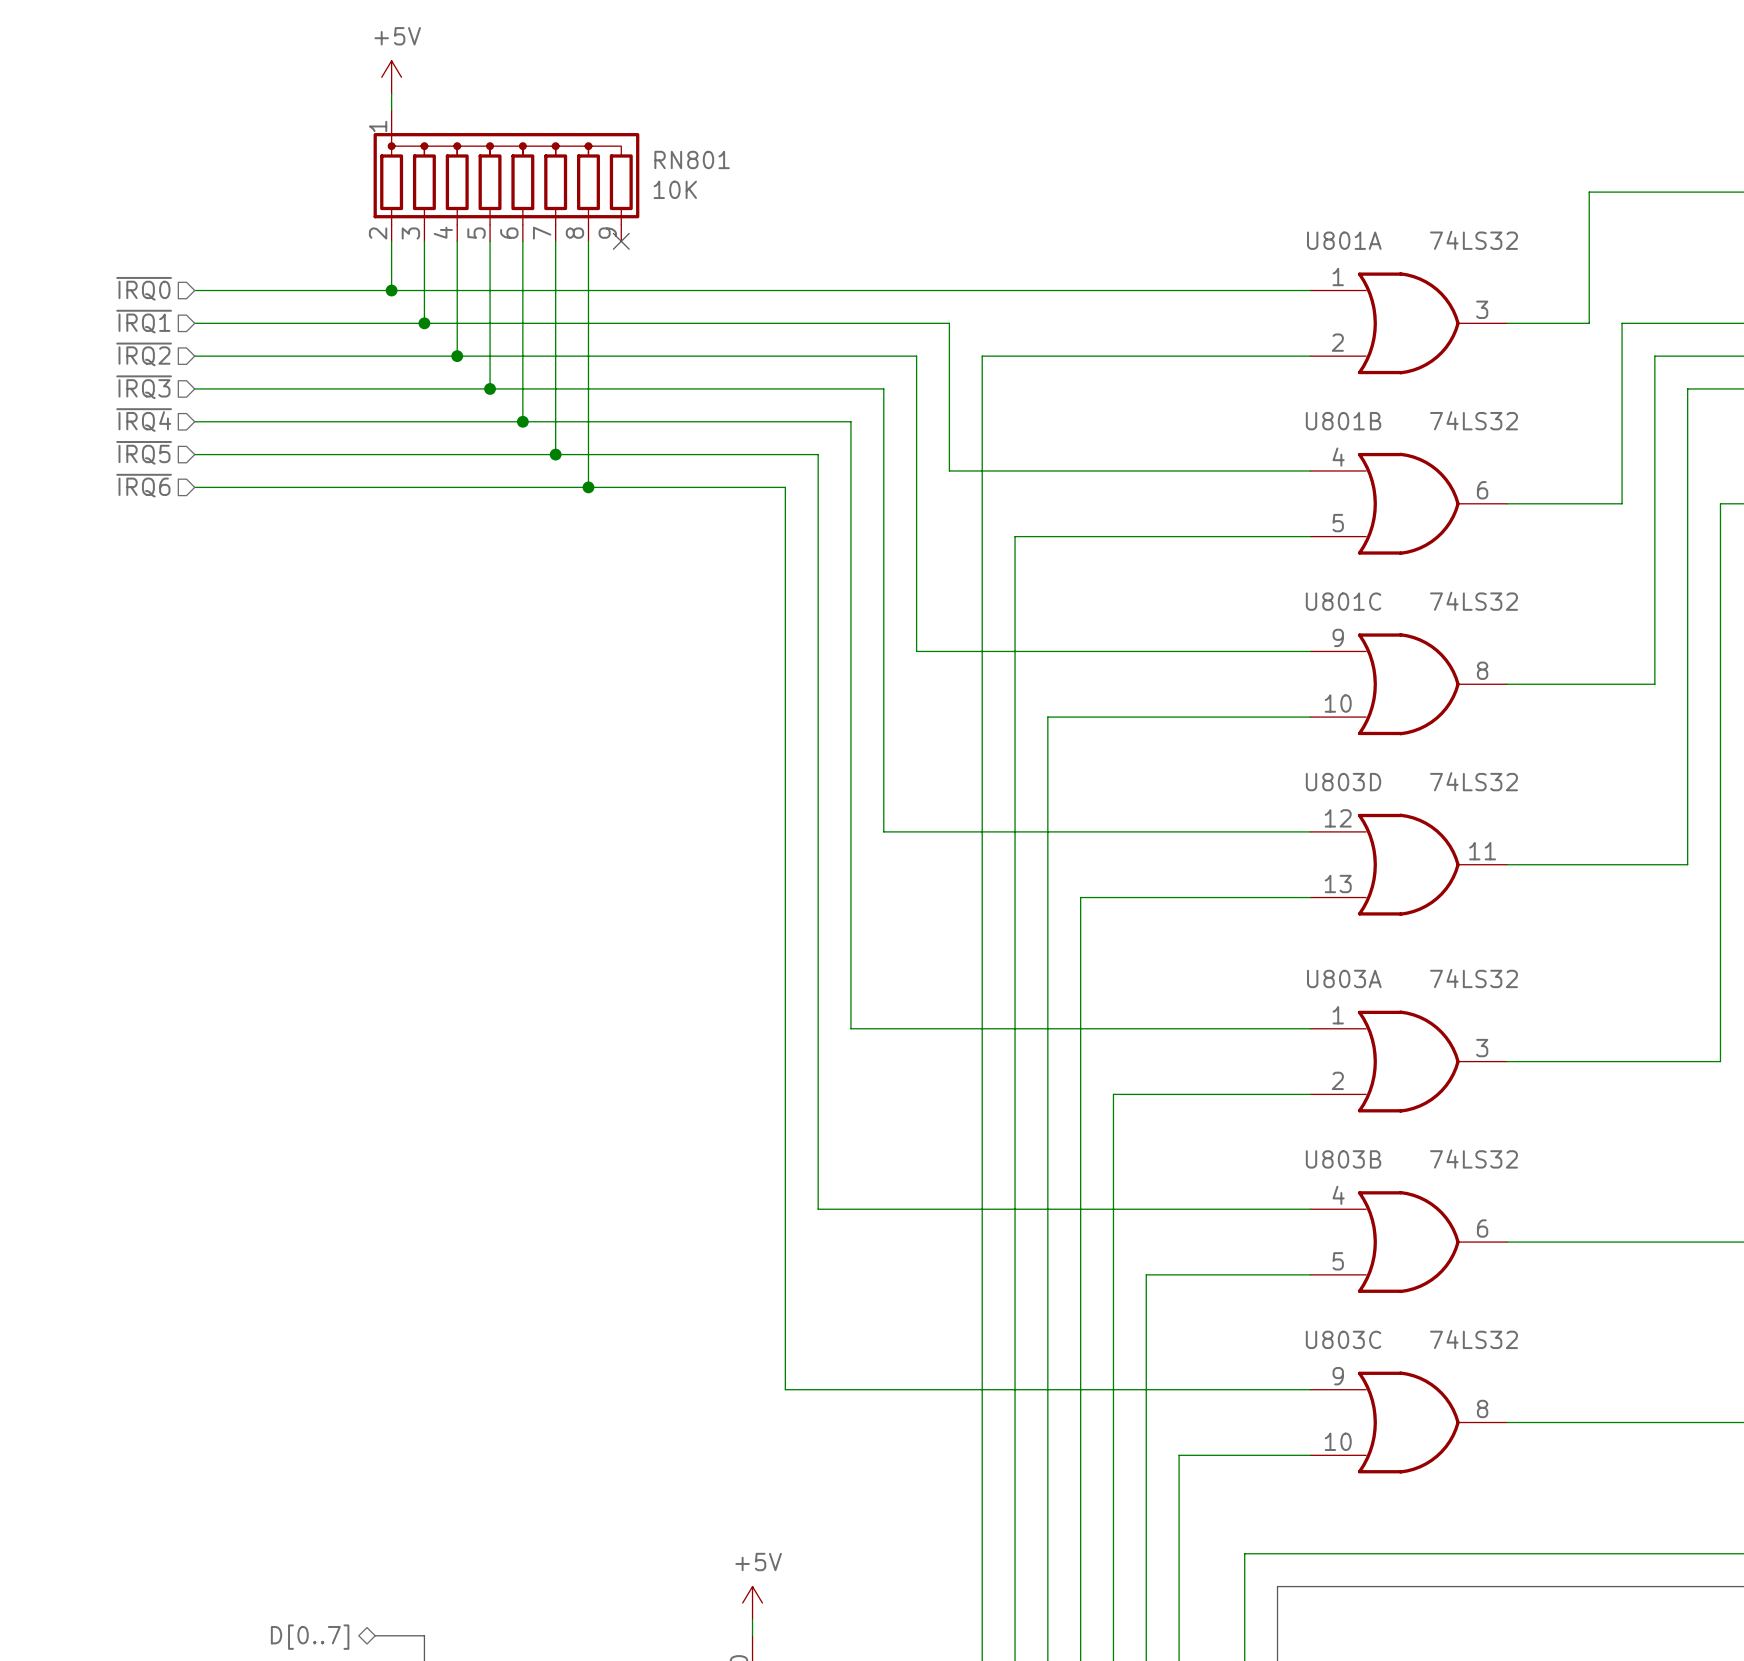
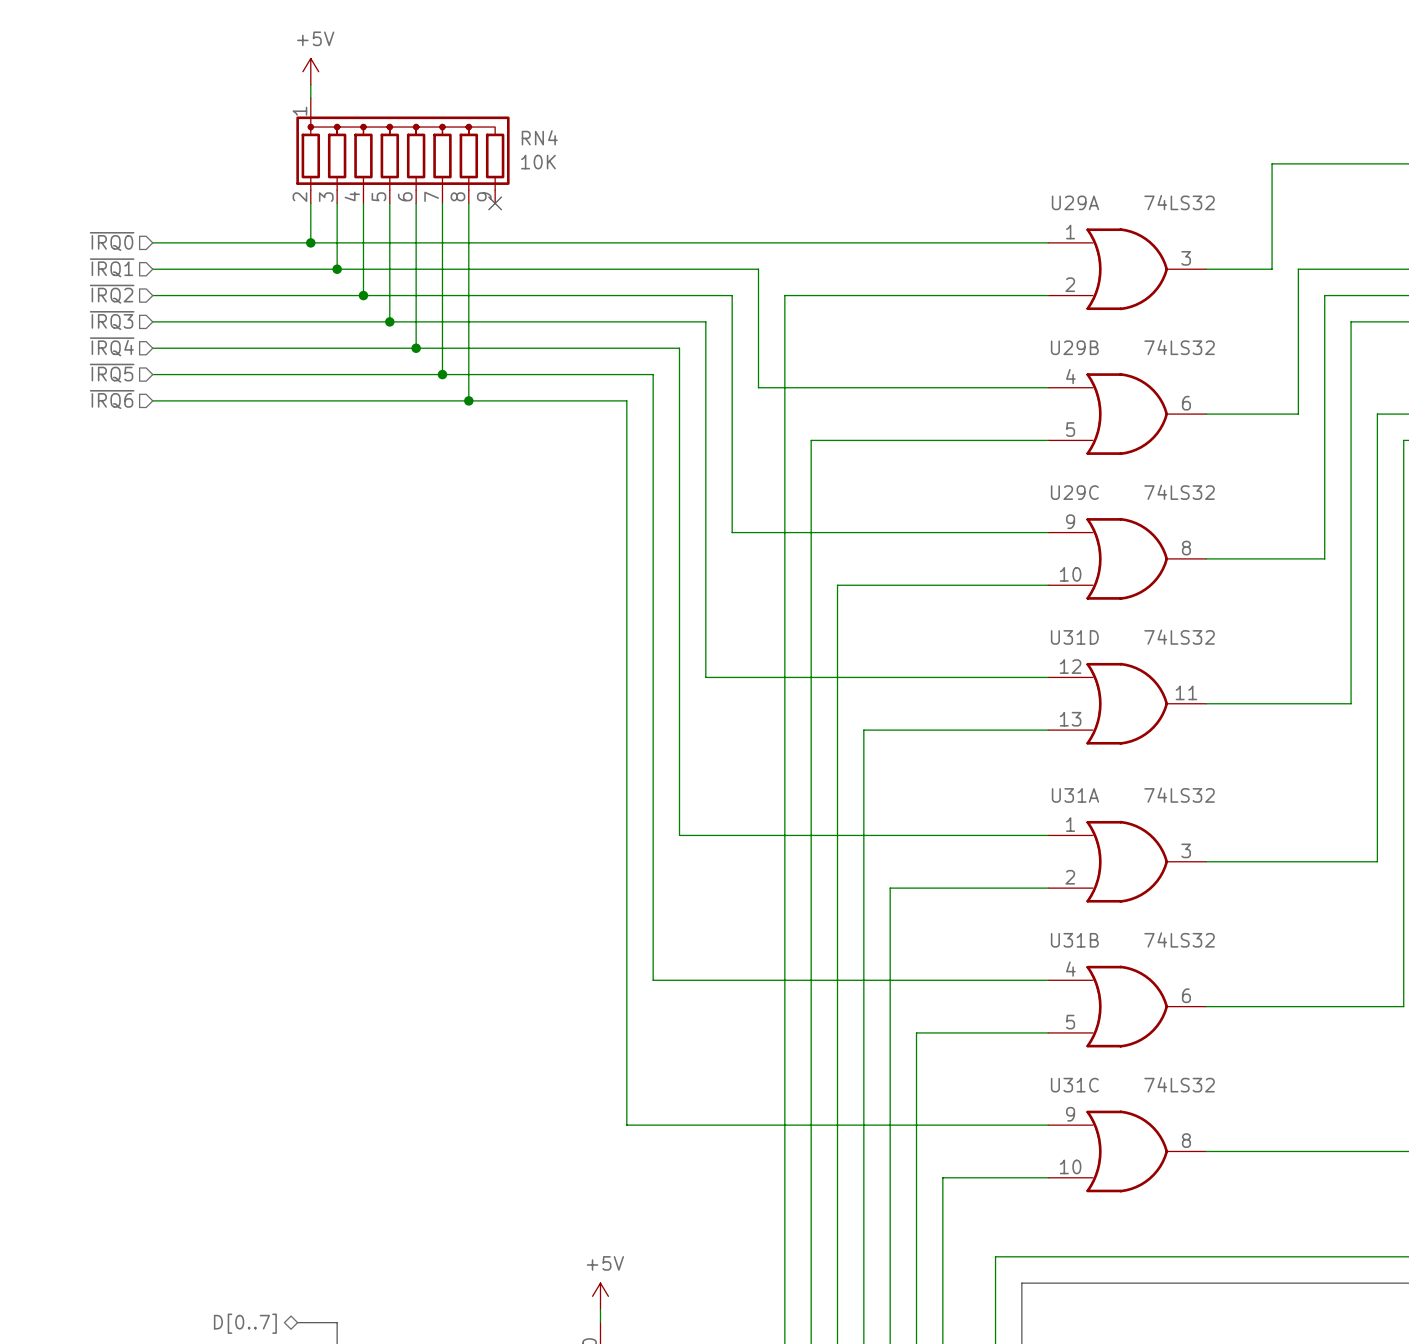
RN801 name: RN801 (692, 159) -> RN4 (539, 137)
U801A name: U801A (1344, 240) -> U29A (1075, 202)
U801B name: U801B (1343, 421) -> U29B (1074, 347)
U801C name: U801C (1343, 601) -> U29C (1074, 492)
U803D name: U803D (1343, 782) -> U31D (1074, 637)
U803A name: U803A (1344, 978) -> U31A (1075, 795)
U803B name: U803B (1343, 1159) -> U31B (1074, 940)
U803C name: U803C (1343, 1339) -> U31C (1074, 1085)

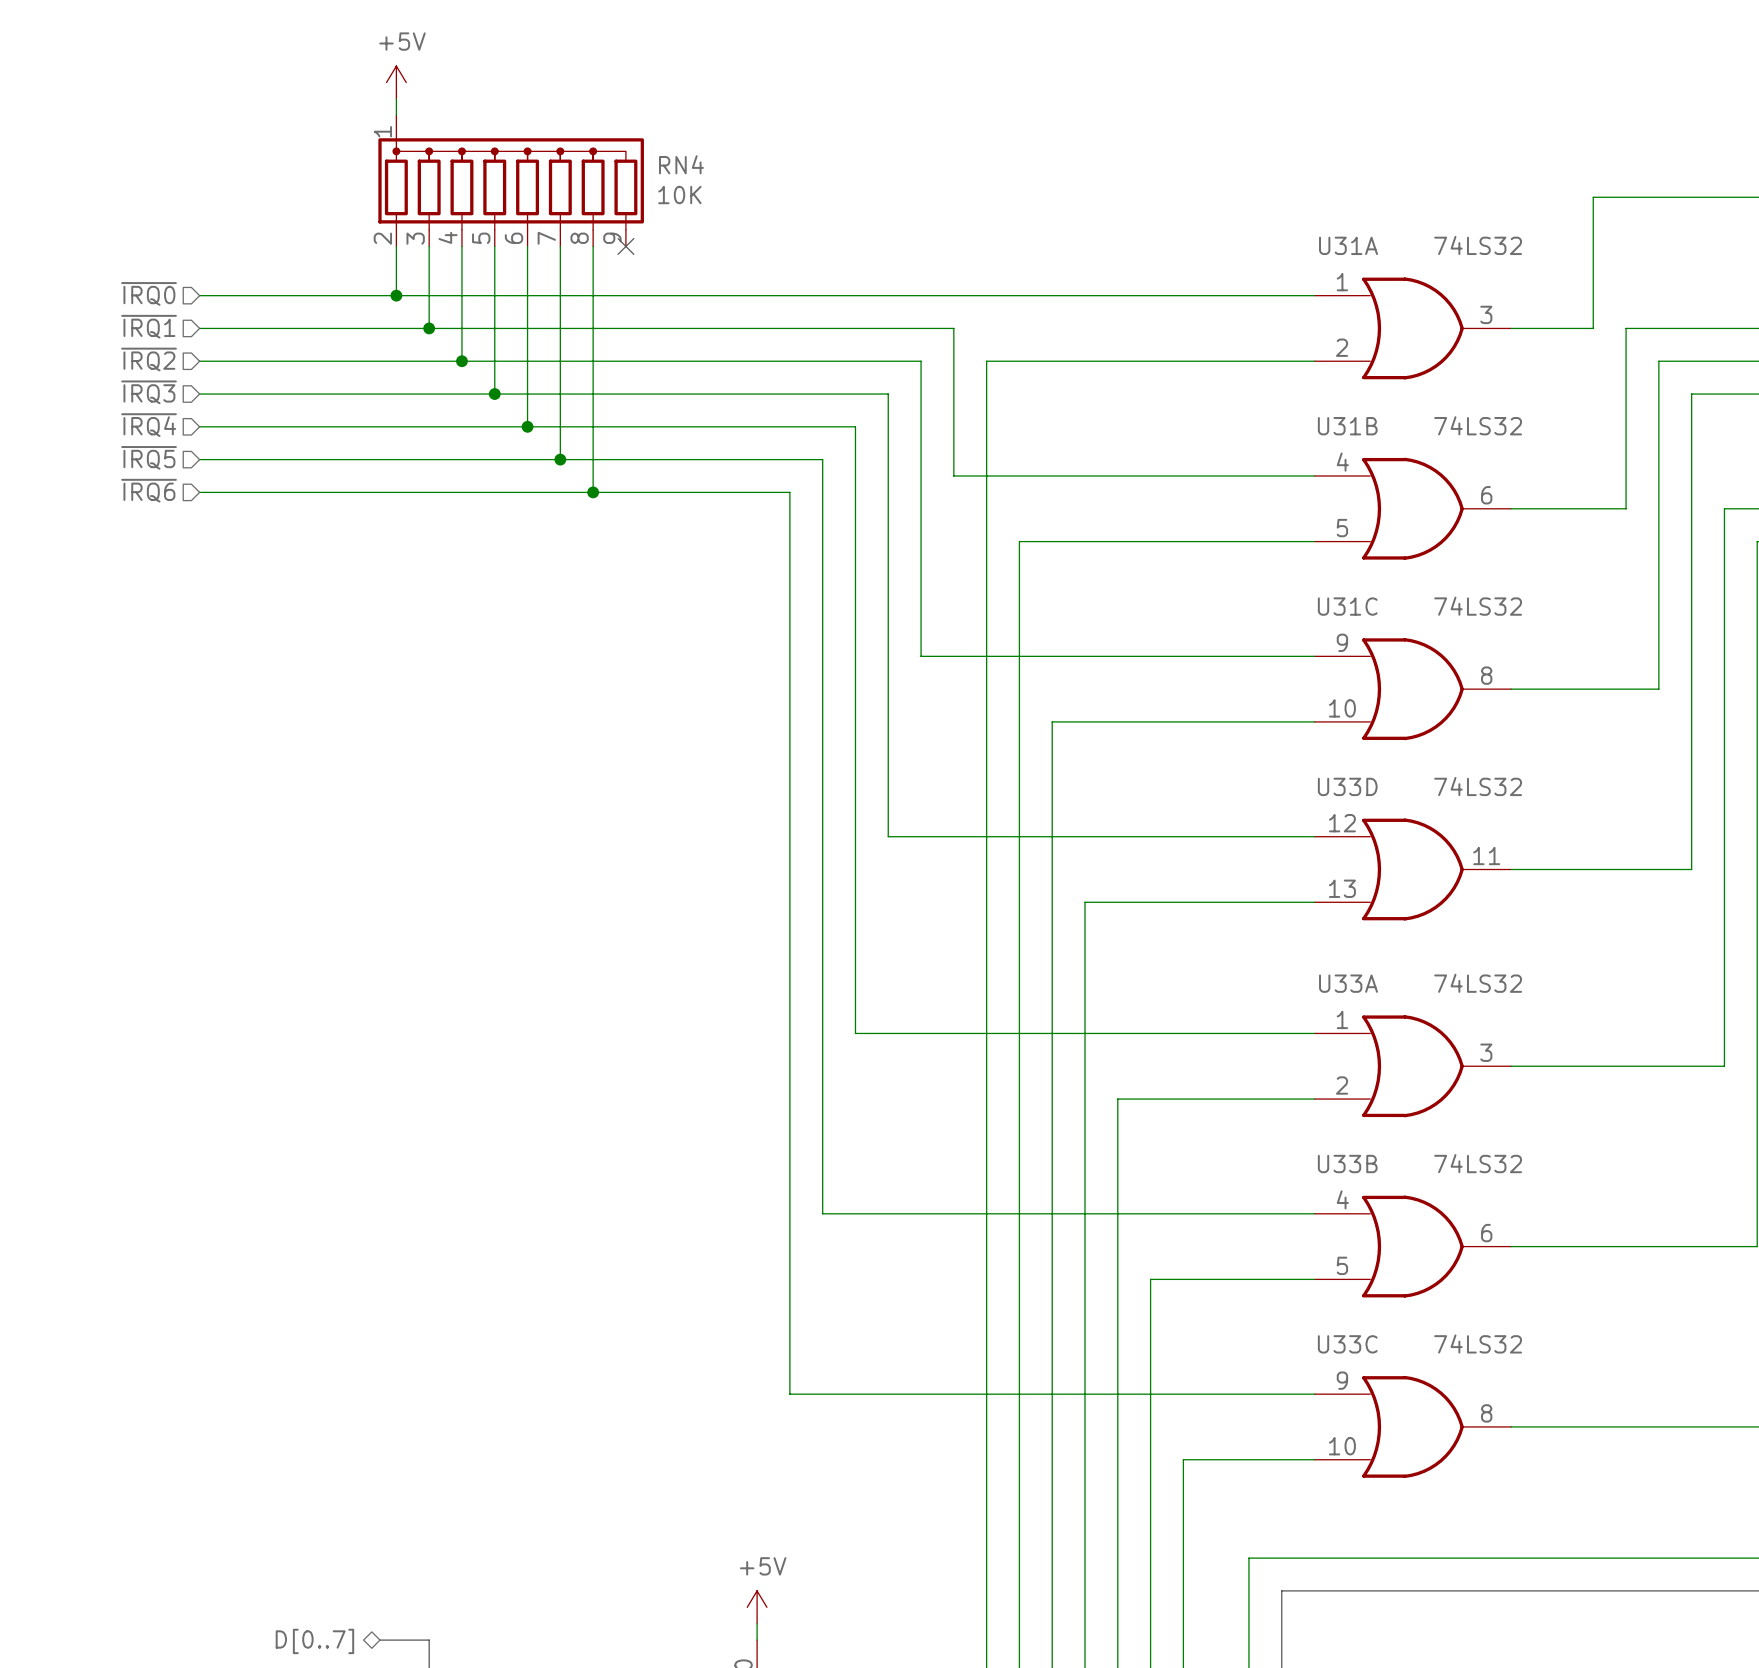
U29A name: U29A (1075, 202) -> U31A (1348, 245)
U29B name: U29B (1074, 347) -> U31B (1347, 426)
U29C name: U29C (1074, 492) -> U31C (1347, 606)
U31D name: U31D (1074, 637) -> U33D (1347, 786)
U31A name: U31A (1075, 795) -> U33A (1348, 983)
U31B name: U31B (1074, 940) -> U33B (1347, 1164)
U31C name: U31C (1074, 1085) -> U33C (1347, 1344)

